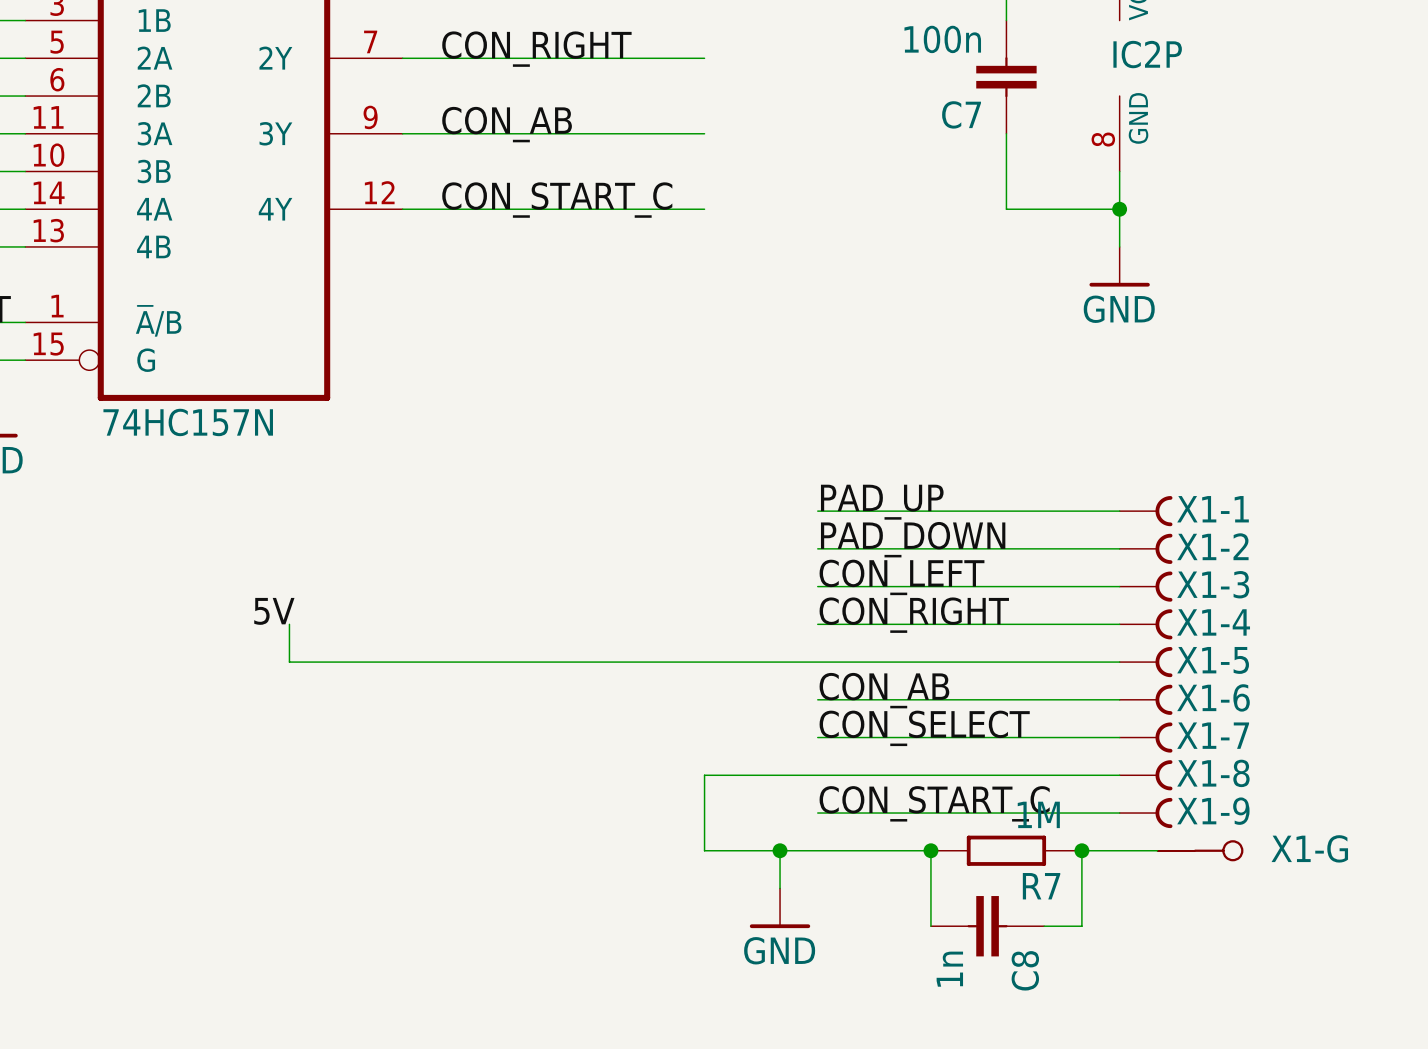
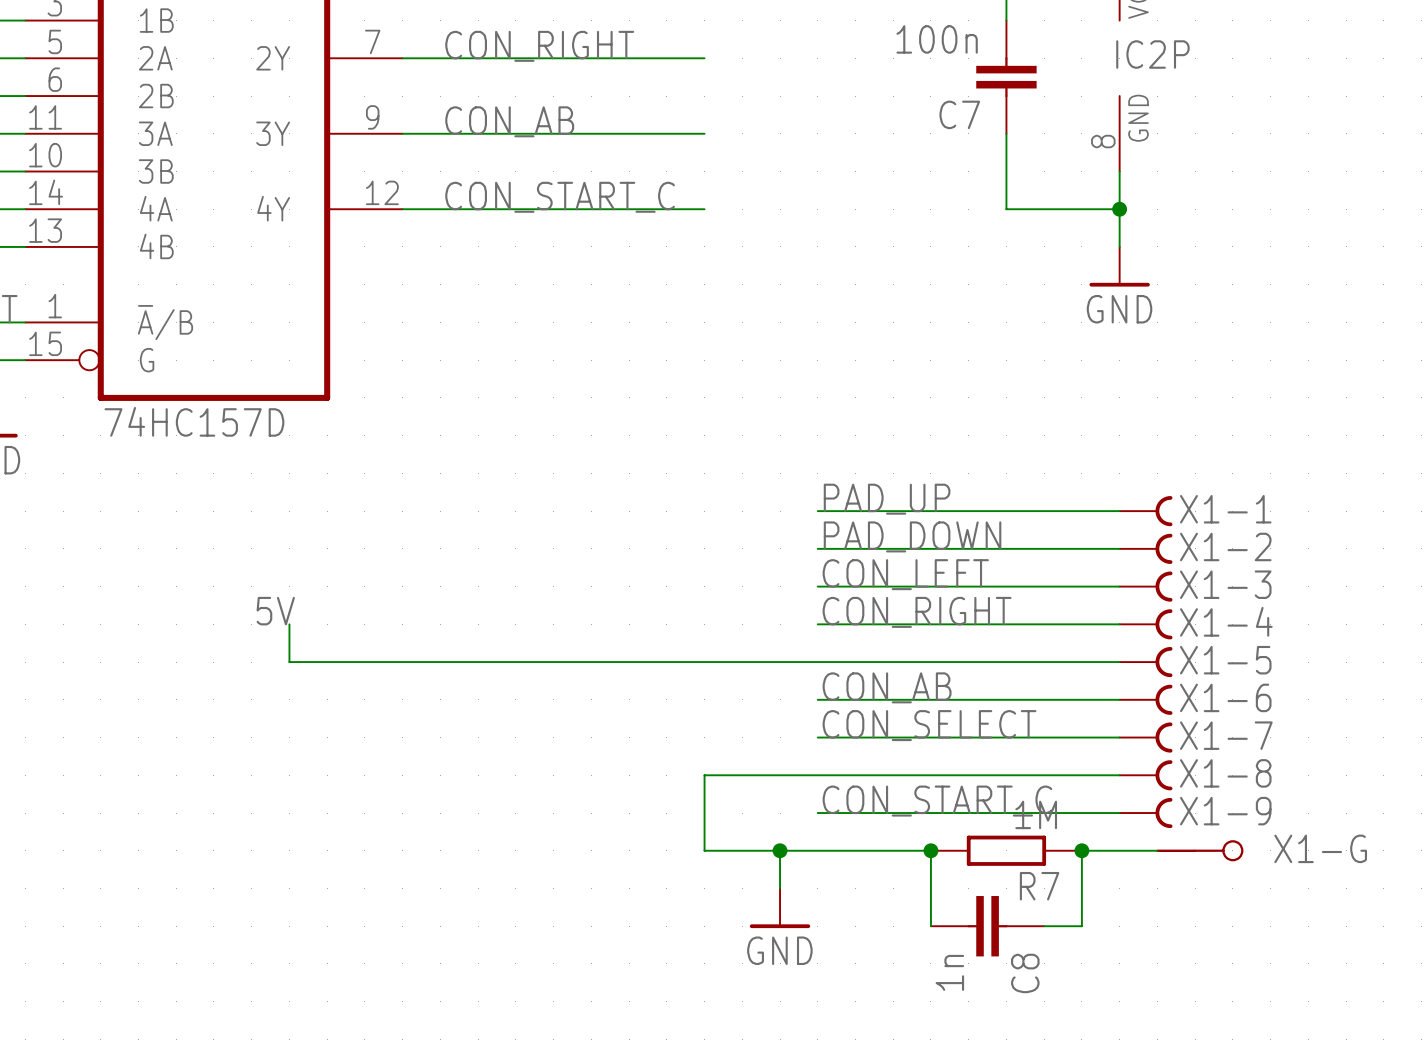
part value: 74HC157N (188, 422) -> 74HC157D (194, 421)

